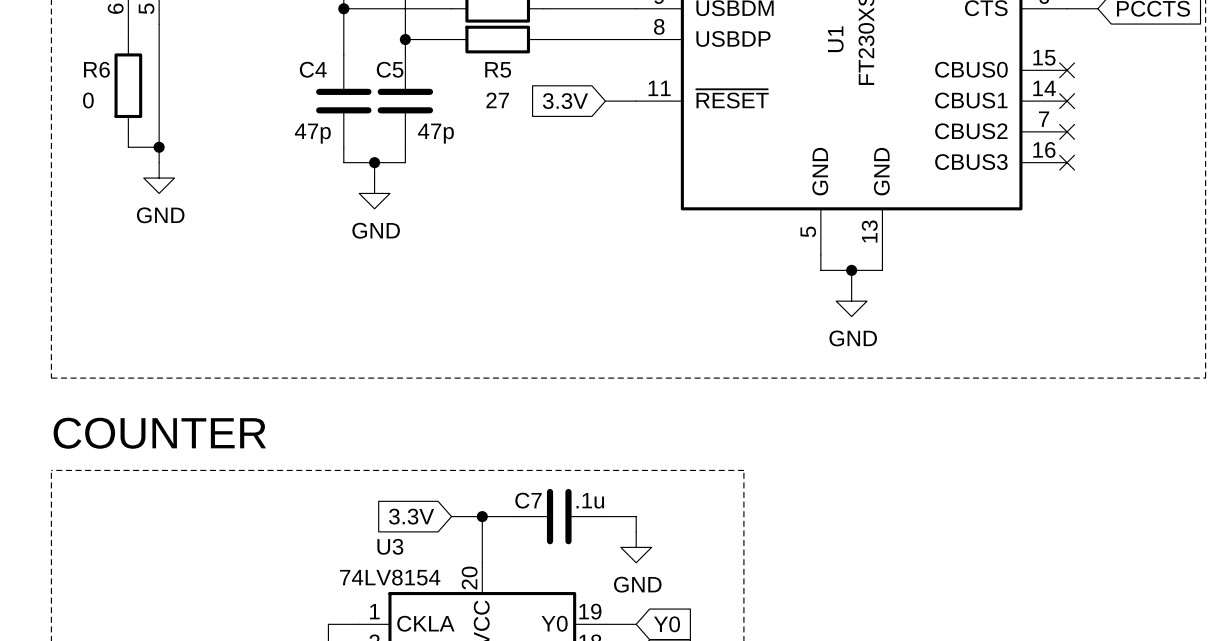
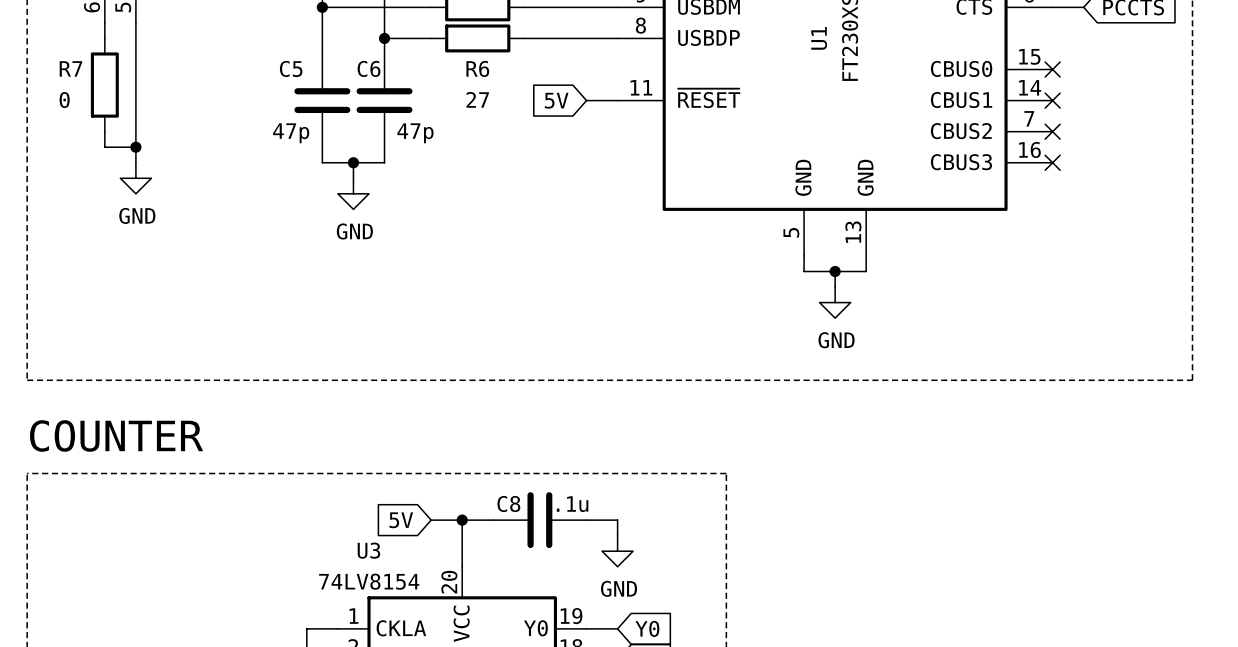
R6 name: R6 (96, 69) -> R7 (71, 68)
C4 name: C4 (313, 69) -> C5 (291, 68)
C5 name: C5 (390, 69) -> C6 (369, 68)
R5 name: R5 (498, 69) -> R6 (477, 68)
global label: 3.3V (565, 101) -> 5V (556, 100)
C7 name: C7 (528, 500) -> C8 (508, 504)
global label: 3.3V (411, 516) -> 5V (401, 520)

